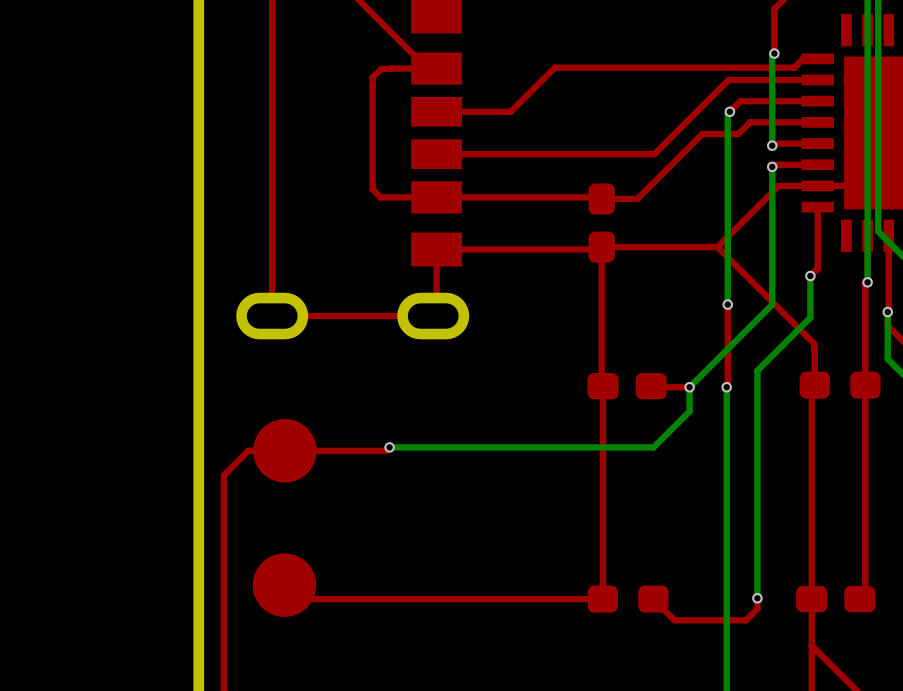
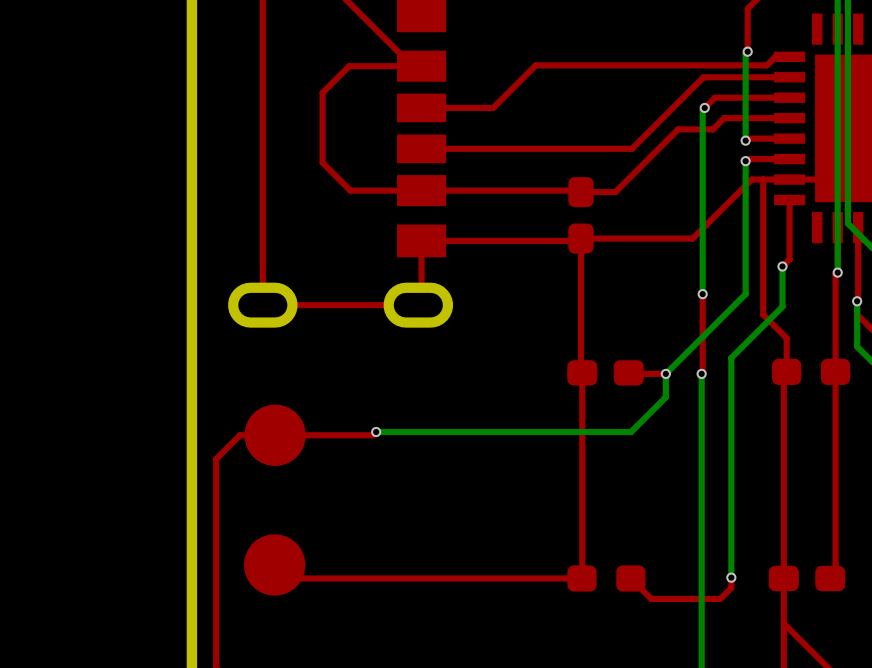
top track: (390, 68) (381, 68) (372, 77) (372, 189) (380, 197) -> (377, 66) (349, 66) (322, 92) (322, 162) (350, 190) (367, 190)
top track: (717, 247) (814, 343) (814, 349) -> (763, 179) (763, 314) (786, 337)

